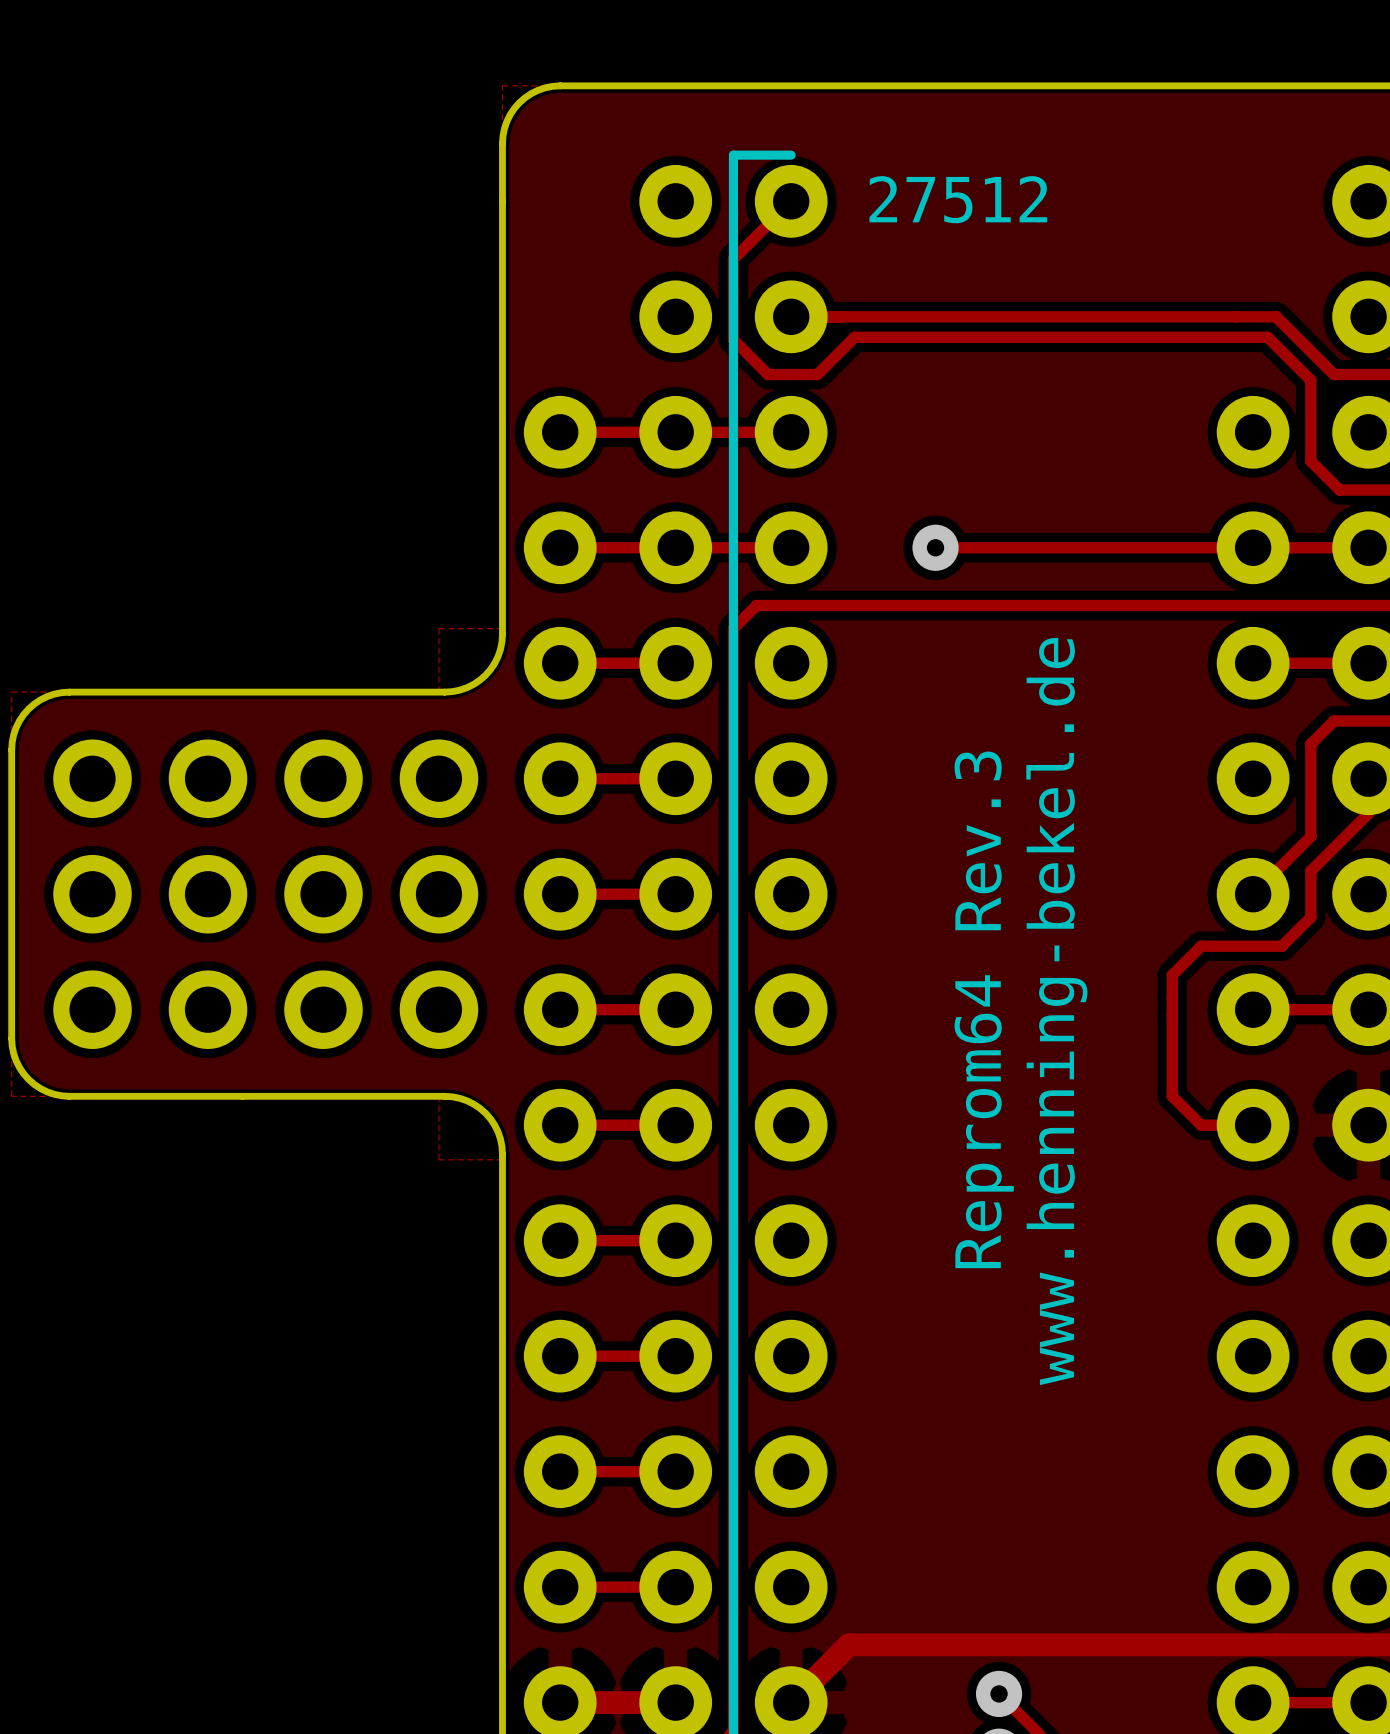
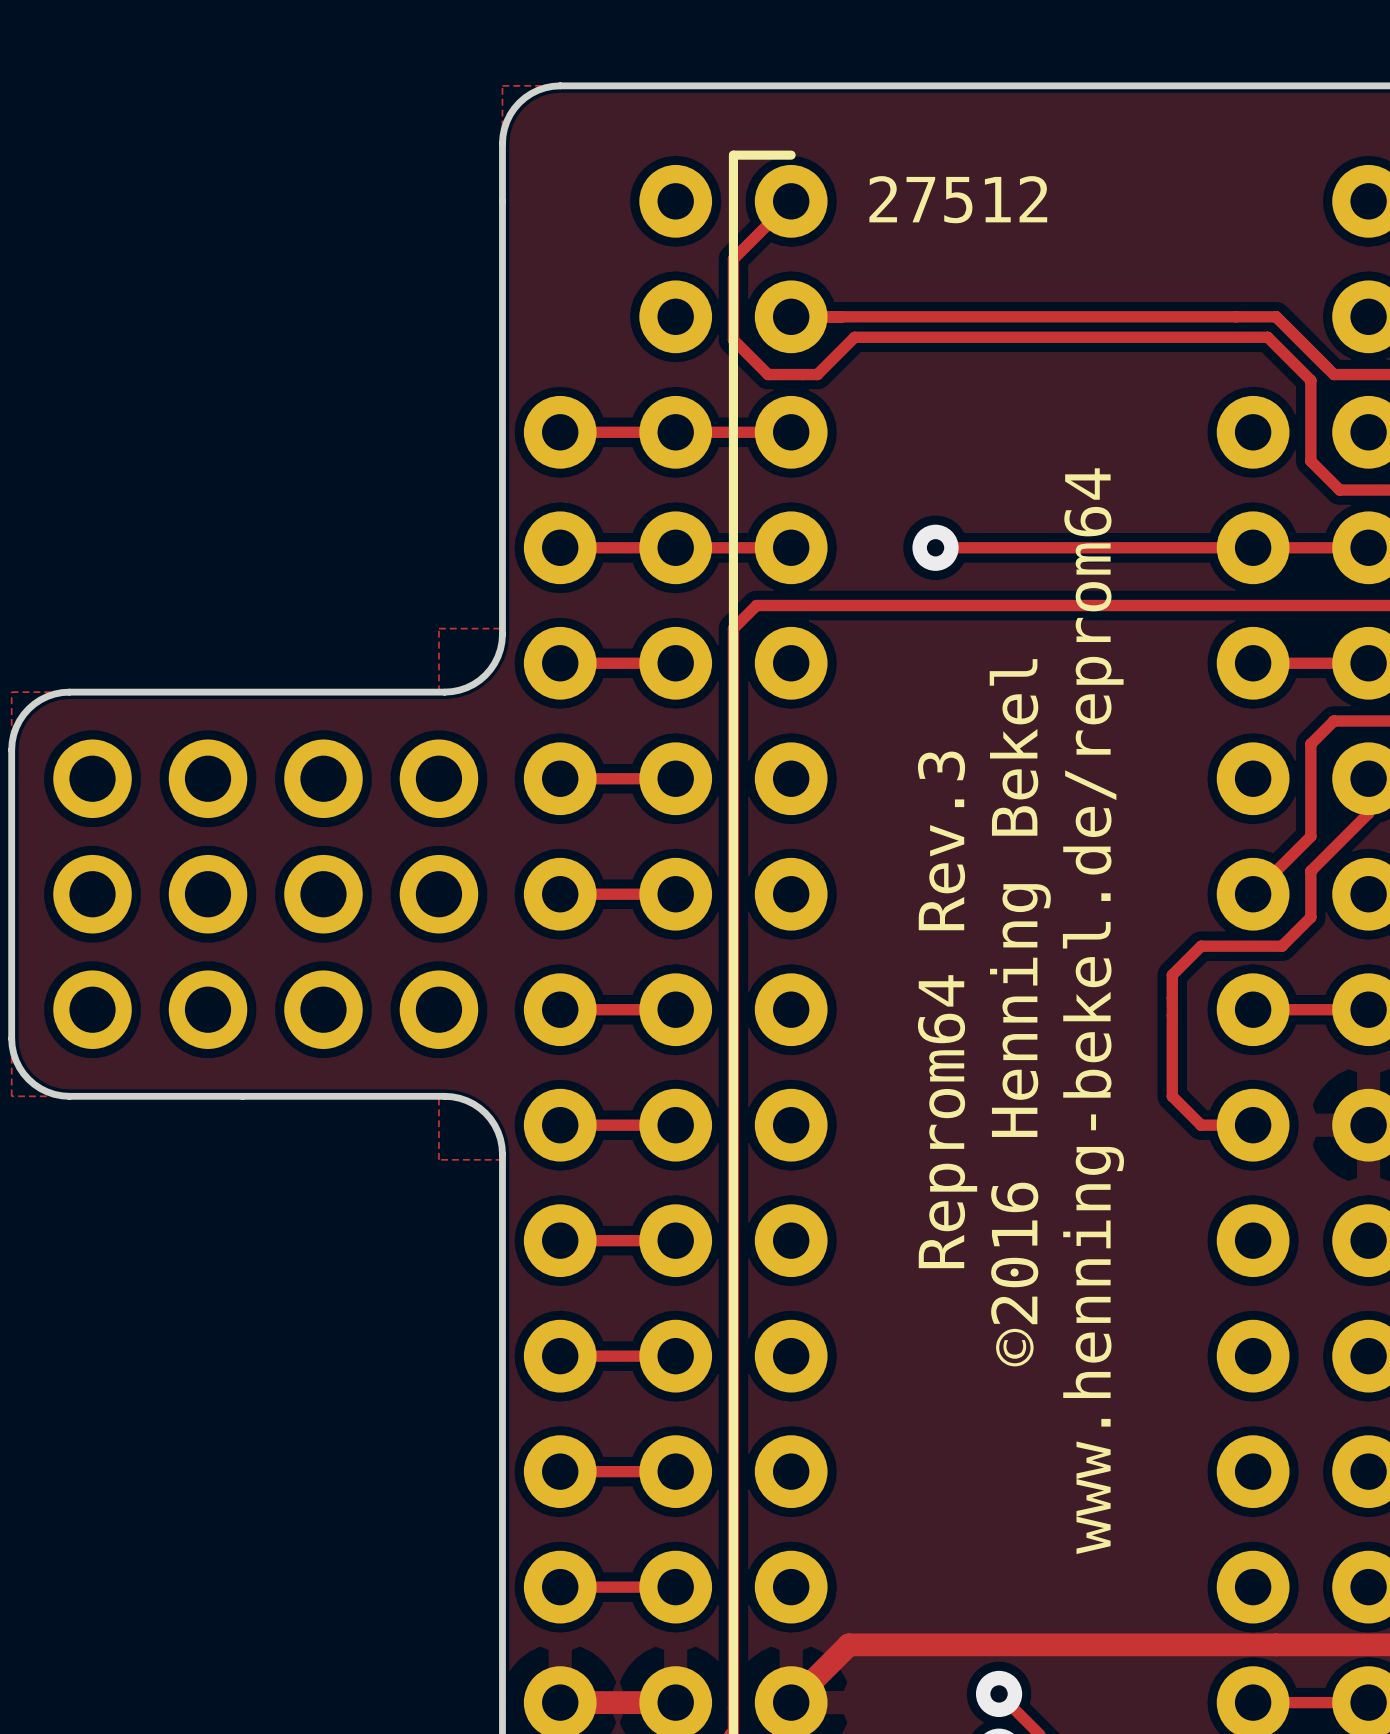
text position: Reprom64 Rev.3 (984, 1009) -> Reprom64 Rev.3 (947, 1009)
text: www.henning-bekel.de (1056, 1011) -> www.henning-bekel.de/reprom64 (1093, 1011)
text: none -> ©2016 Henning Bekel (1020, 1012)

